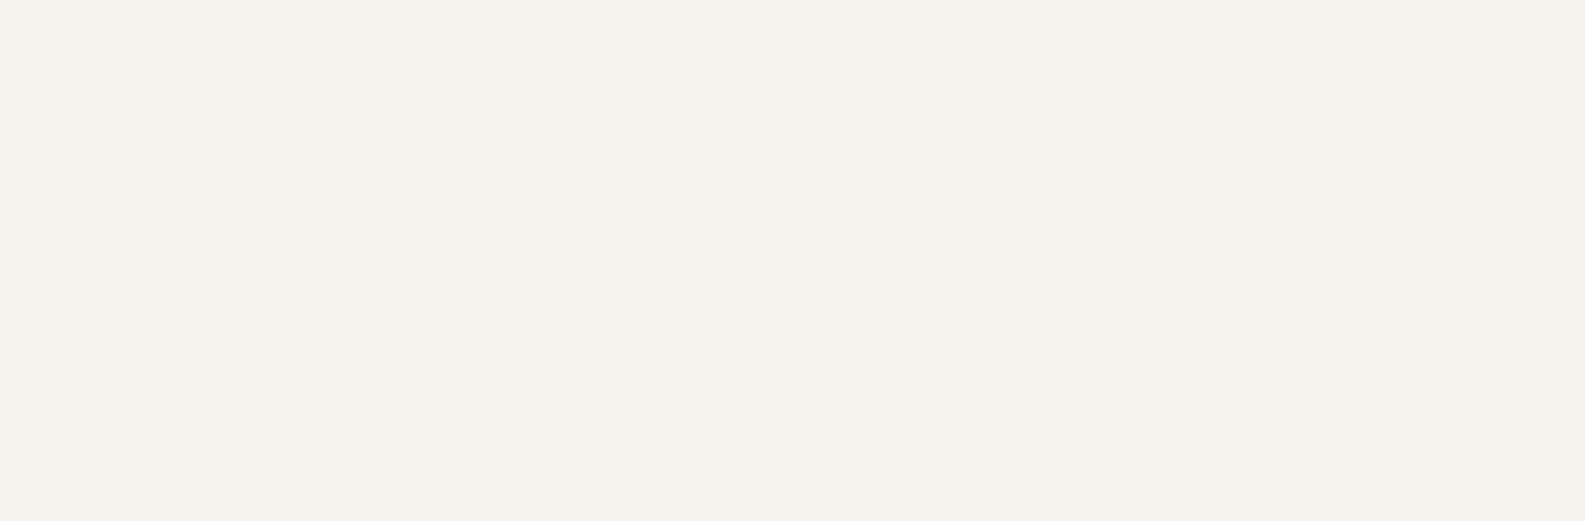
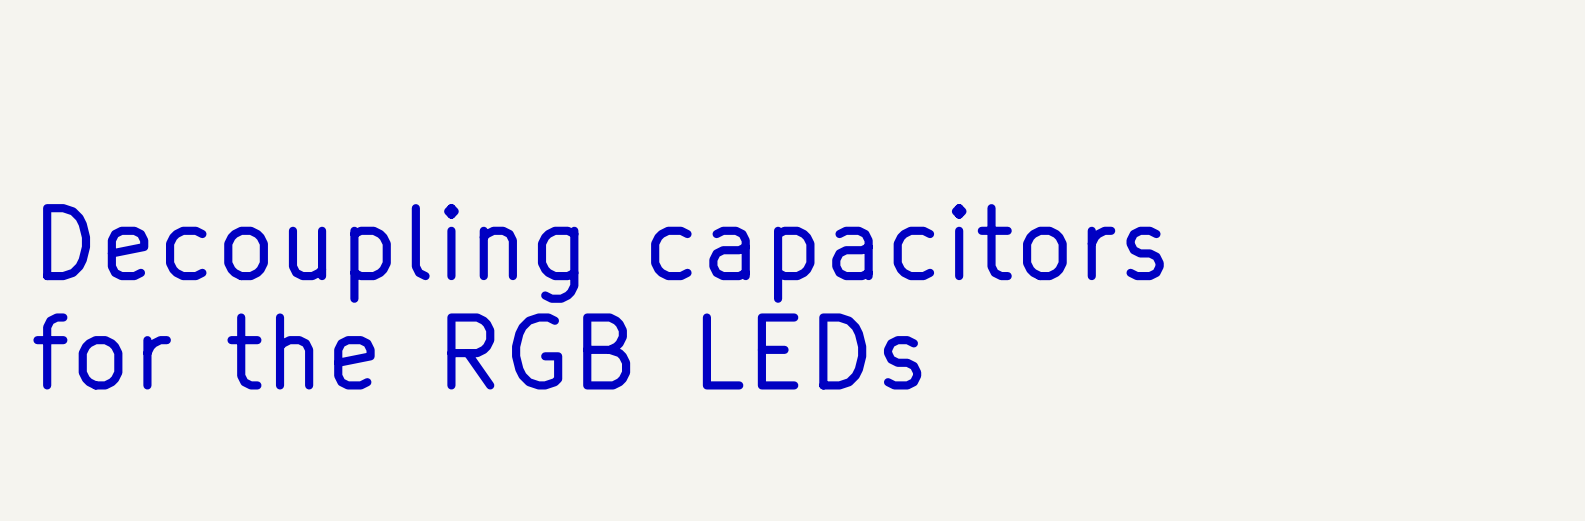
text: none -> Decoupling capacitors (603, 253)
text: none -> for the RGB LEDs (477, 351)

